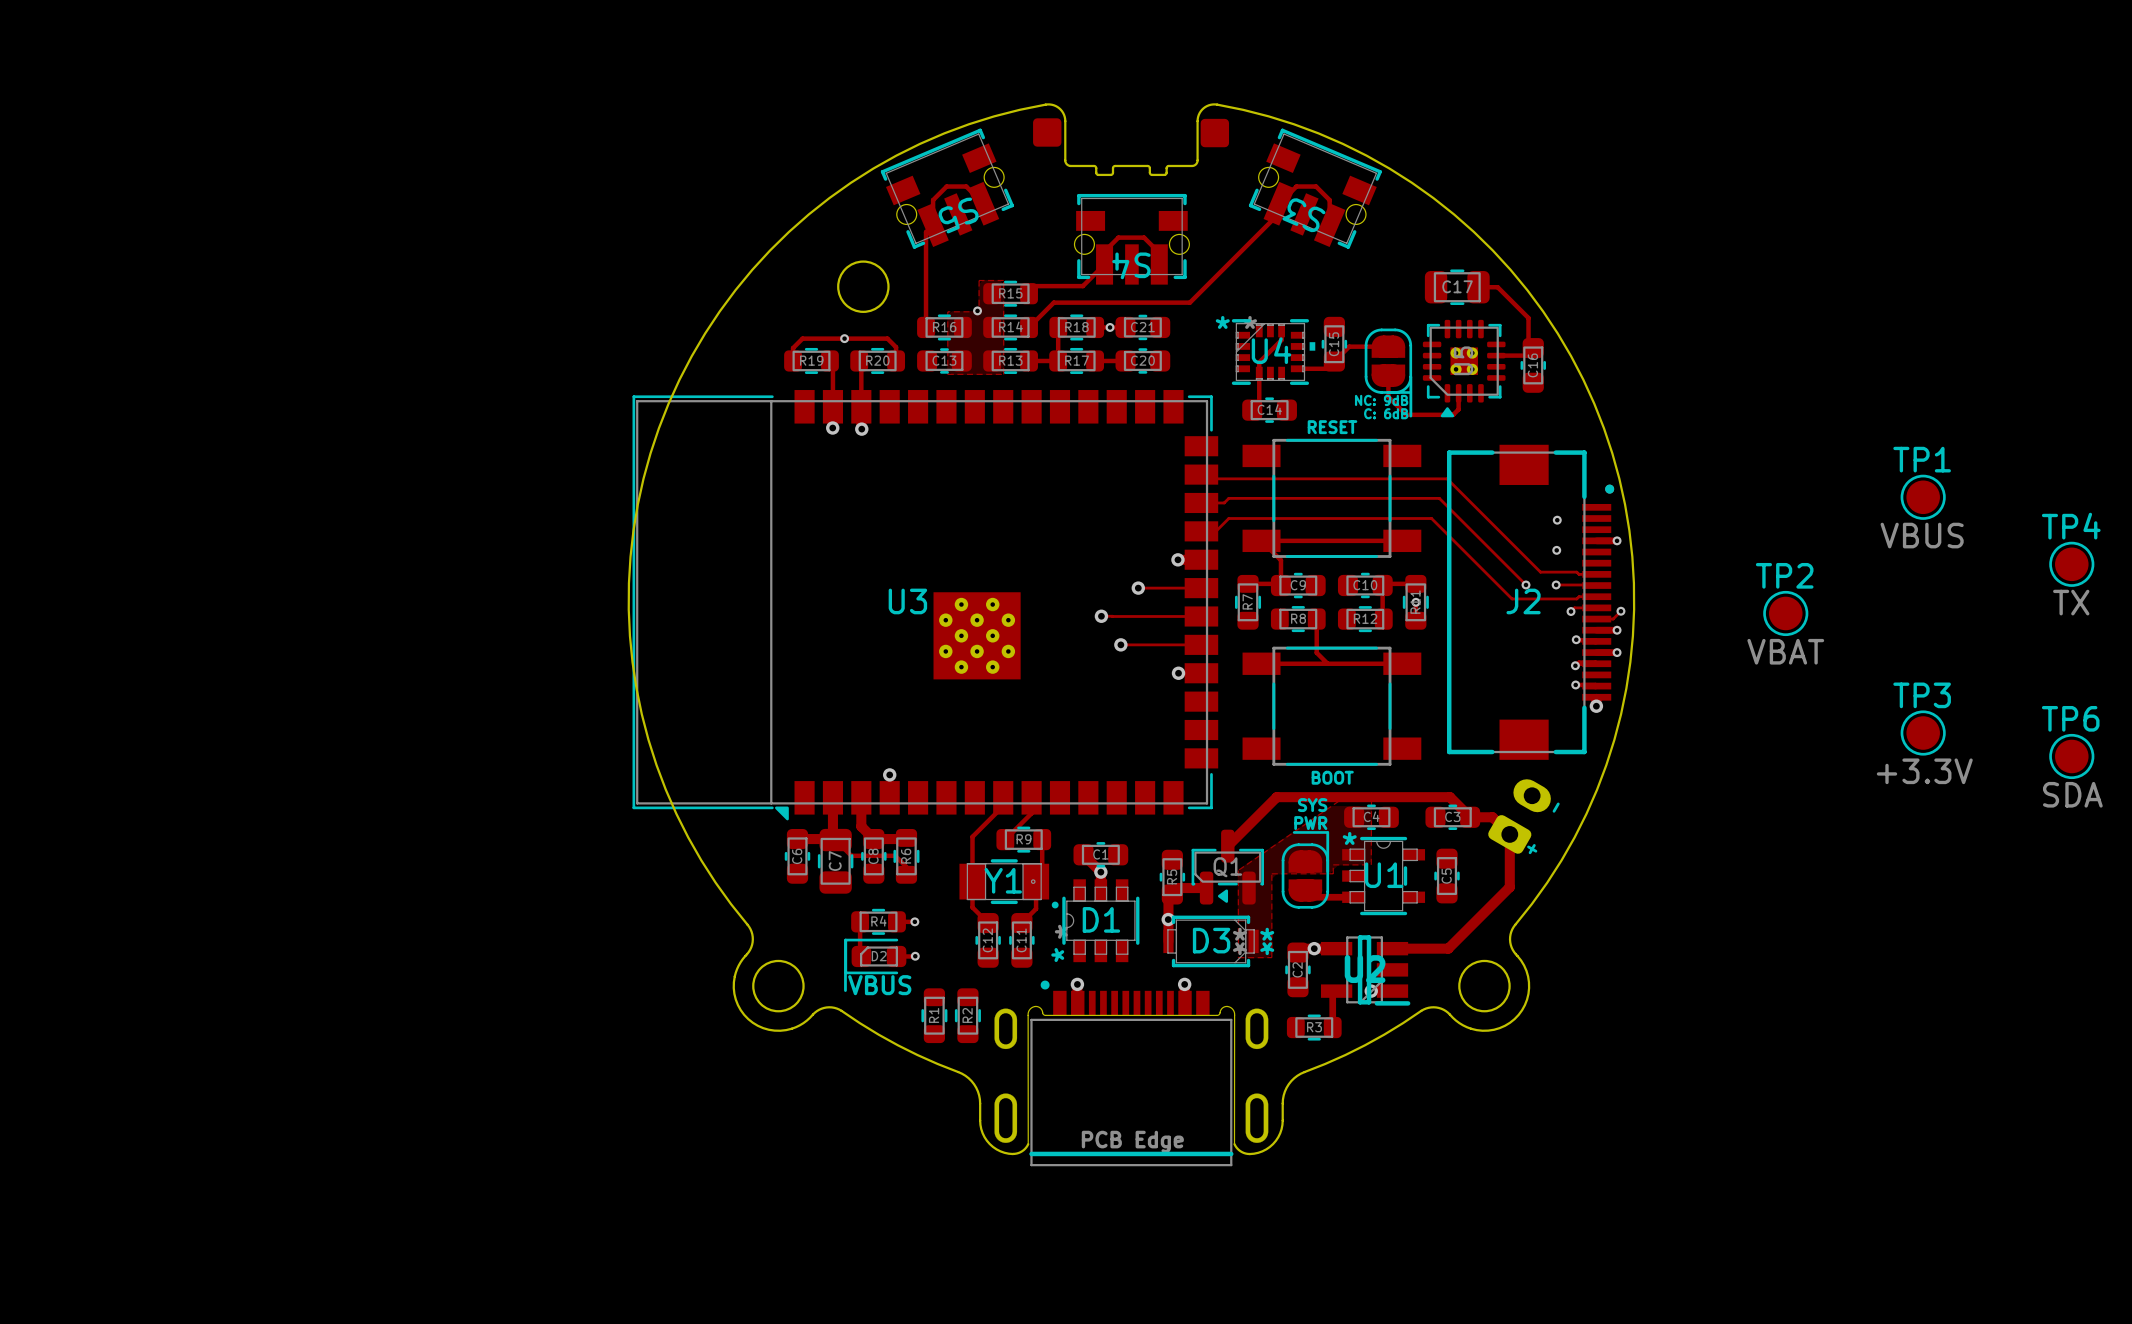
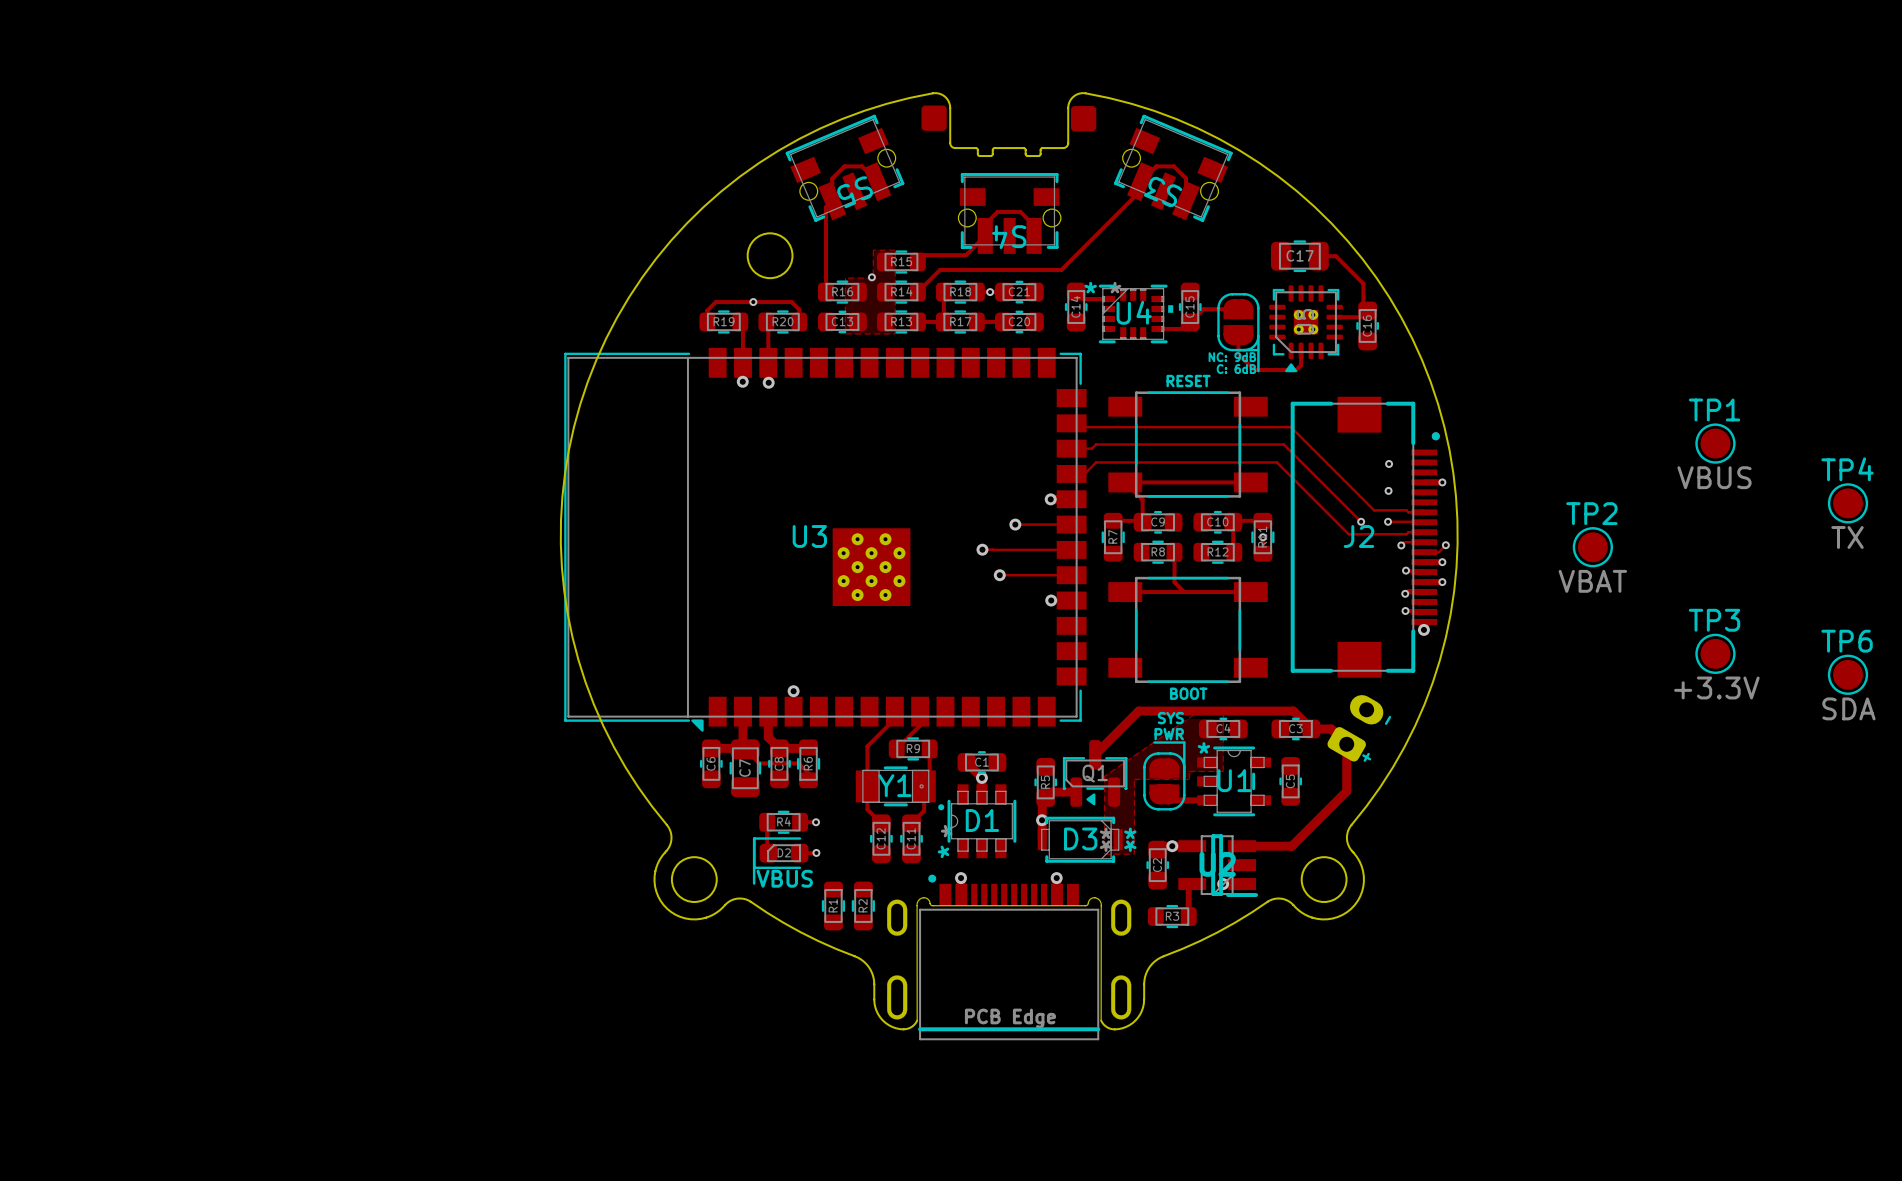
track: none -> (1076, 291) (1083, 299) (1109, 299)
track: (1281, 330) (1281, 340) (1259, 362) (1259, 403) (1252, 410) -> none
C14 rotation: 0° (1269, 410) -> 90° clockwise (1076, 307)
C14 position: (1269, 410) -> (1076, 307)

